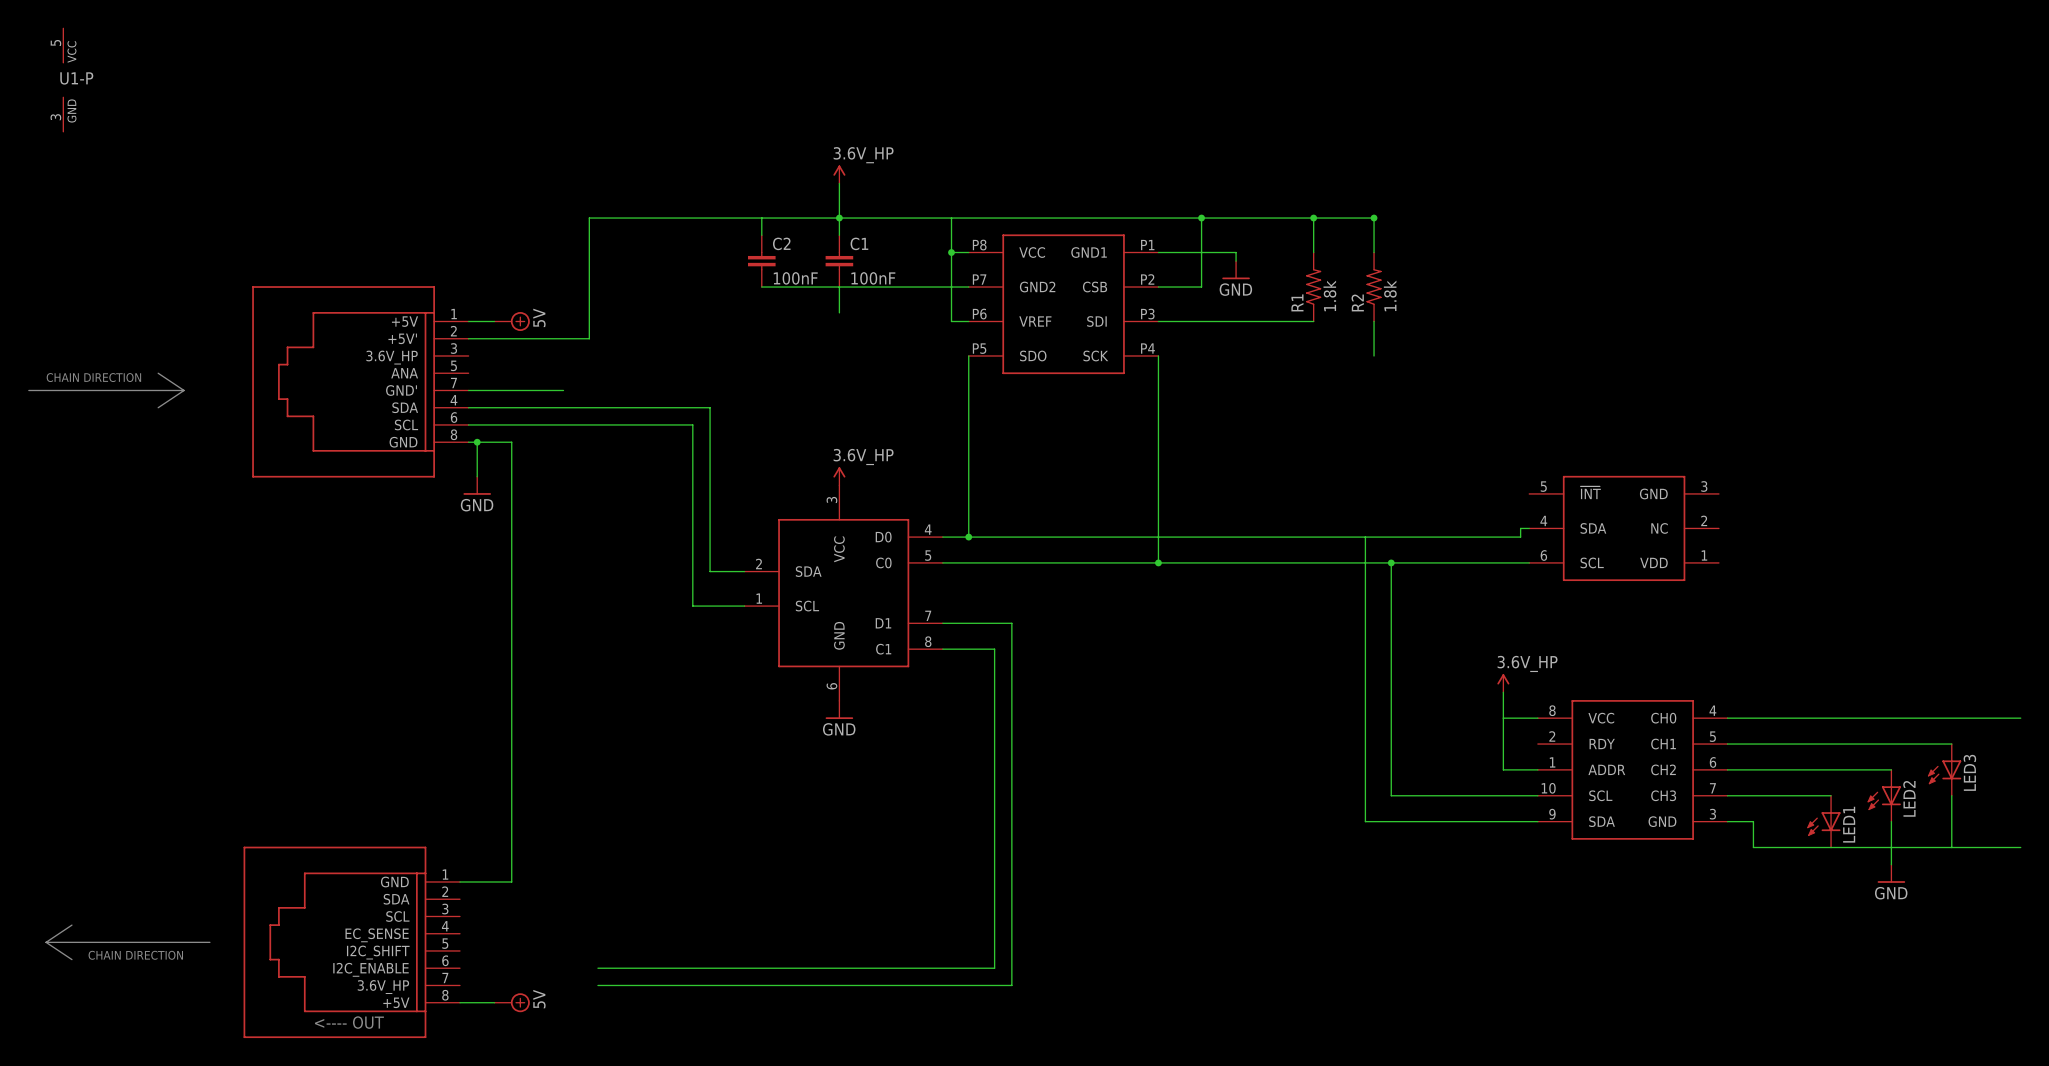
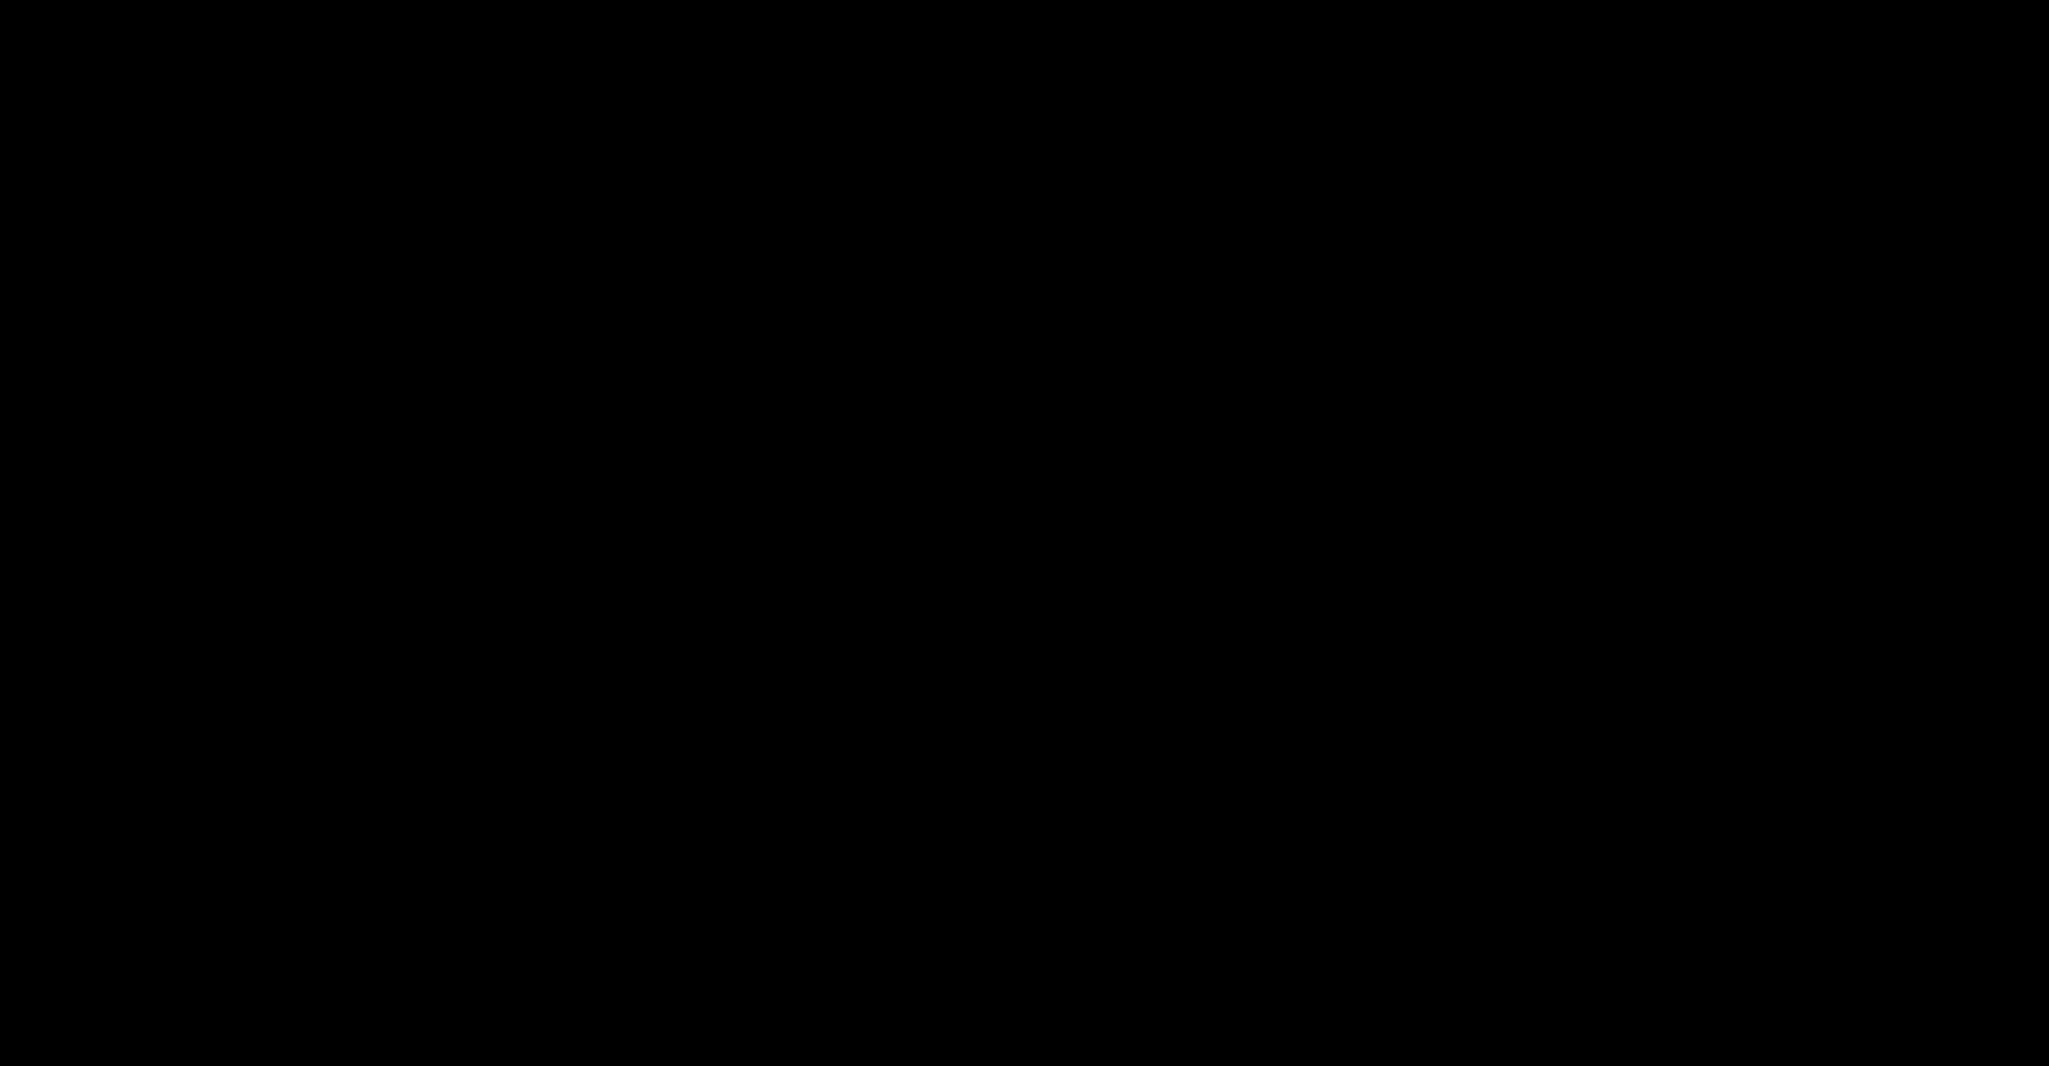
U1-P: (63, 80) -> none
power symbol: 3.6V_HP (839, 174) -> none
wire: (839, 183) (839, 235) -> none
wire: (761, 218) (761, 235) -> none
junction: (839, 218) -> none
wire: (951, 218) (951, 321) (968, 321) -> none
wire: (1201, 218) (1201, 287) (1158, 287) -> none
junction: (1201, 218) -> none
wire: (1313, 218) (1313, 252) -> none
junction: (1313, 218) -> none
junction: (1374, 218) -> none
wire: (951, 252) (968, 252) -> none
junction: (951, 252) -> none
wire: (1158, 252) (1236, 252) (1236, 261) -> none
wire: (1374, 252) (1374, 218) (589, 218) (589, 338) (468, 338) -> none
C2: 100nF (761, 261) -> none
C1: 100nF (839, 261) -> none
power symbol: GND (1236, 270) -> none
wire: (761, 287) (968, 287) -> none
wire: (839, 287) (839, 312) -> none
R1: 1.8k (1313, 287) -> none
R2: 1.8k (1374, 287) -> none
part: (1063, 304) -> none
wire: (468, 321) (494, 321) -> none
power symbol: 5V (512, 321) -> none
wire: (1158, 321) (1313, 321) -> none
wire: (1374, 321) (1374, 355) -> none
wire: (968, 355) (968, 537) -> none
wire: (1158, 355) (1158, 562) -> none
line: (158, 373) (184, 390) -> none
text: CHAIN DIRECTION (93, 377) -> none
part: (360, 381) -> none
line: (28, 390) (184, 390) -> none
line: (184, 390) (158, 407) -> none
wire: (468, 390) (563, 390) -> none
wire: (468, 407) (710, 407) (710, 571) (744, 571) -> none
wire: (468, 424) (692, 424) (692, 606) (744, 606) -> none
wire: (468, 442) (511, 442) (511, 881) (459, 881) -> none
wire: (477, 442) (477, 476) -> none
junction: (477, 442) -> none
power symbol: 3.6V_HP (839, 476) -> none
power symbol: GND (477, 485) -> none
wire: (1529, 528) (1520, 528) (1520, 537) (942, 537) -> none
part: (1624, 528) -> none
junction: (968, 537) -> none
wire: (1365, 537) (1365, 821) (1537, 821) -> none
wire: (942, 562) (1529, 562) -> none
junction: (1158, 562) -> none
wire: (1391, 562) (1391, 795) (1537, 795) -> none
junction: (1391, 562) -> none
part: (843, 593) -> none
wire: (942, 623) (1011, 623) (1011, 985) (597, 985) -> none
wire: (942, 649) (994, 649) (994, 968) (597, 968) -> none
power symbol: 3.6V_HP (1503, 683) -> none
wire: (1503, 692) (1503, 769) (1537, 769) -> none
power symbol: GND (839, 709) -> none
wire: (1503, 718) (1537, 718) -> none
wire: (1727, 718) (2020, 718) -> none
wire: (1727, 744) (1951, 744) -> none
part: (1632, 769) -> none
wire: (1727, 769) (1891, 769) -> none
LED3: (1944, 769) -> none
wire: (1727, 795) (1831, 795) -> none
LED2: (1884, 795) -> none
wire: (1951, 795) (1951, 847) -> none
wire: (1727, 821) (1753, 821) (1753, 847) (2020, 847) -> none
LED1: (1823, 821) -> none
wire: (1891, 821) (1891, 864) -> none
power symbol: GND (1891, 873) -> none
line: (71, 925) (46, 942) -> none
line: (46, 942) (209, 942) -> none
line: (46, 942) (71, 959) -> none
part: (351, 942) -> none
text: CHAIN DIRECTION (135, 955) -> none
wire: (459, 1002) (494, 1002) -> none
power symbol: 5V (512, 1002) -> none

